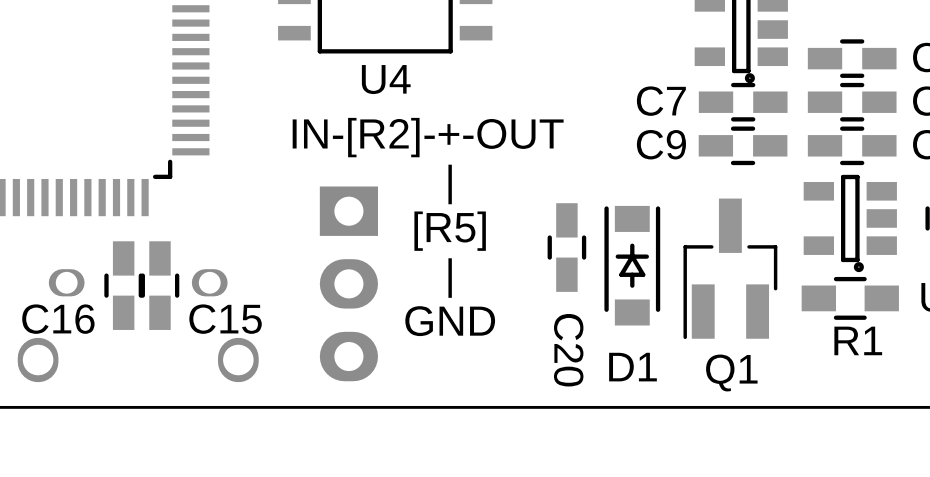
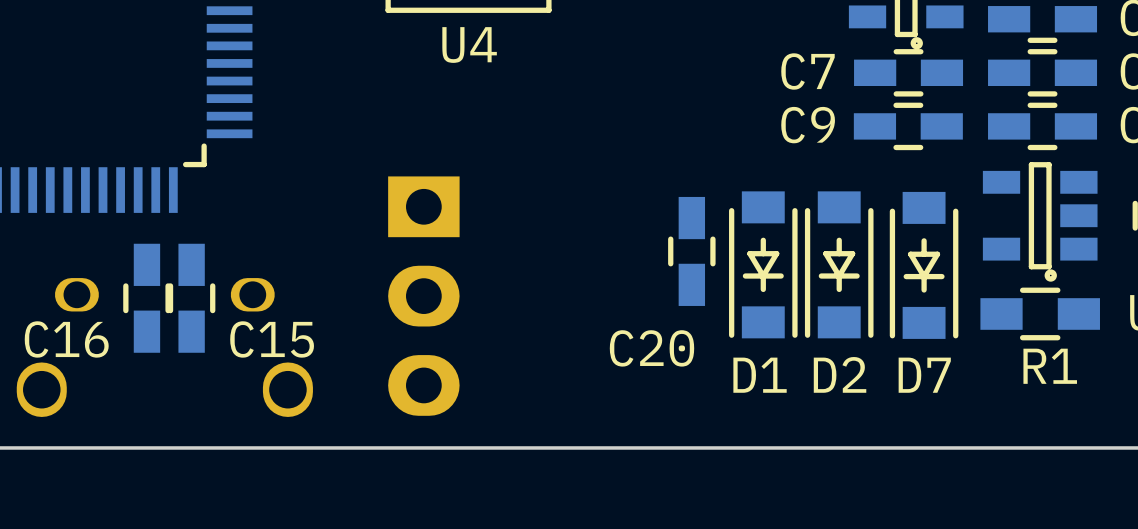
text: IN-[R2]-+-OUT (428, 137) -> none
text: | (450, 184) -> none
text: [R5] (450, 231) -> none
D2: none -> (839, 264)
D7: none -> (924, 265)
D1 rotation: 0° (632, 265) -> 180° (763, 264)
Q1: (730, 268) -> none
text: | (450, 278) -> none
text: GND (450, 321) -> none
C20 name rotation: 0° (568, 350) -> 90° counterclockwise (652, 348)

